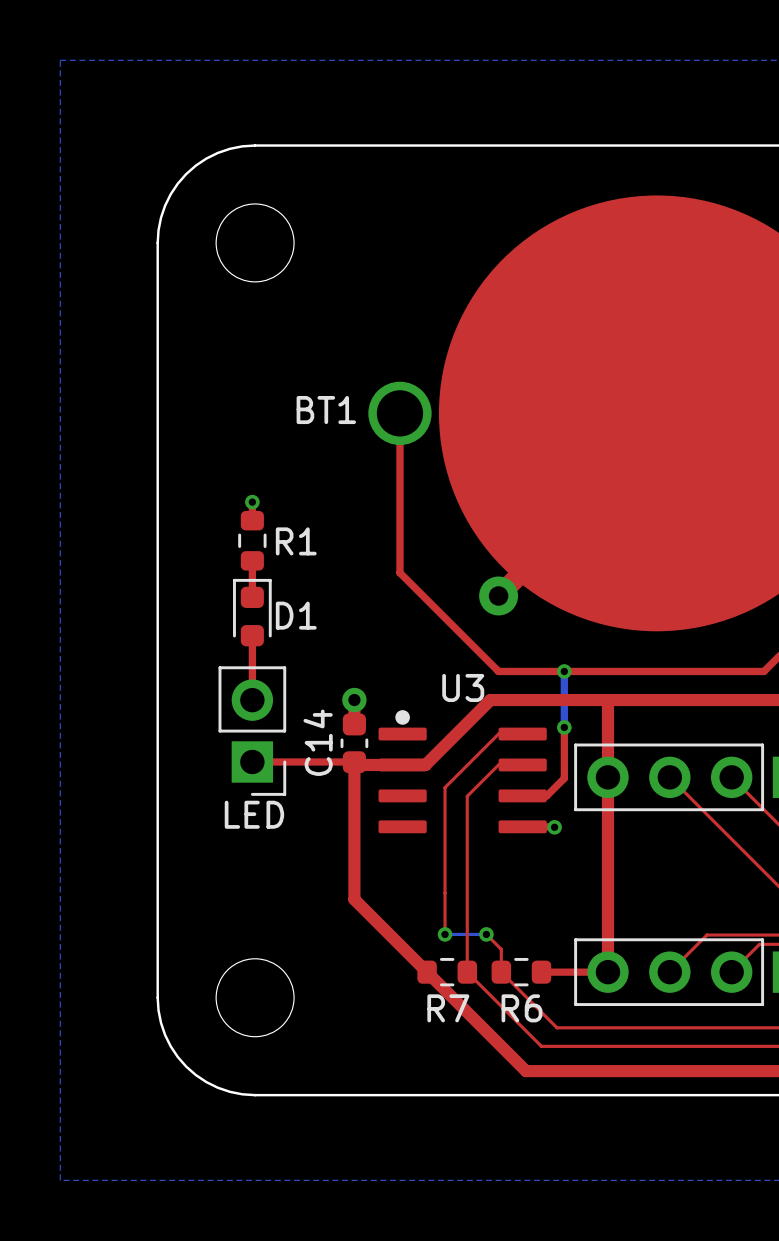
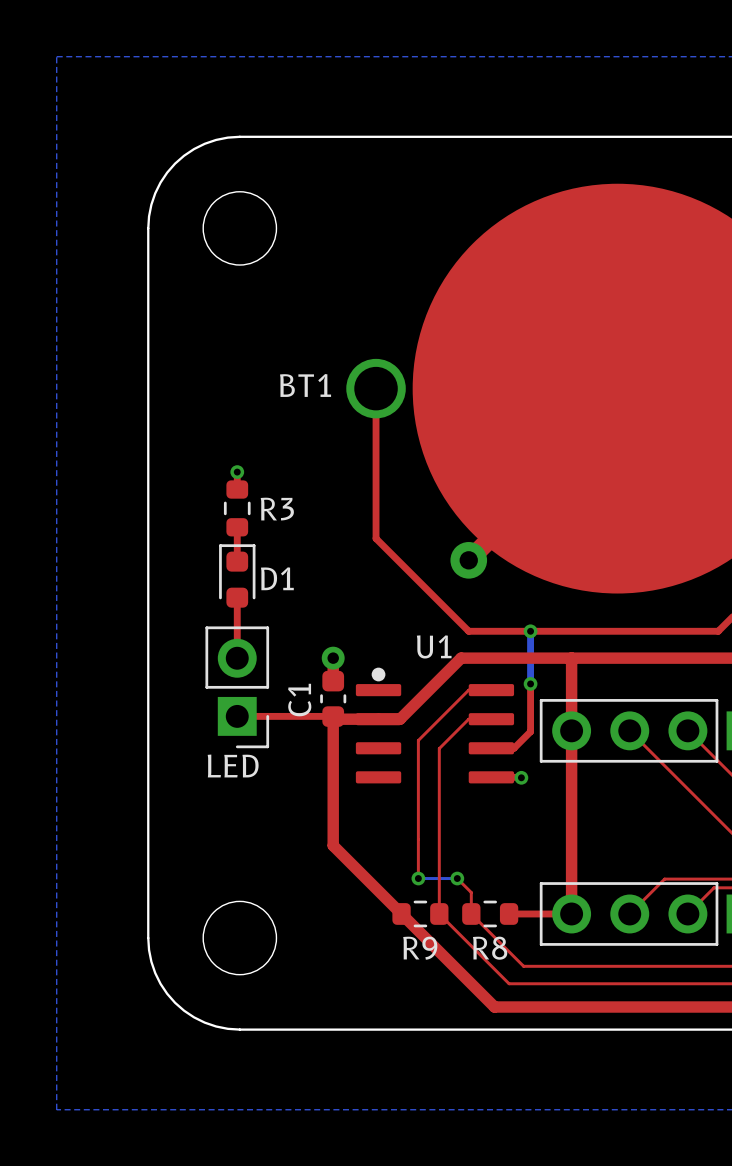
R1 name: R1 (296, 541) -> R3 (277, 509)
U3 name: U3 (463, 687) -> U1 (434, 646)
C14 name: C14 (318, 742) -> C1 (299, 700)
R7 name: R7 (448, 1008) -> R9 (420, 948)
R6 name: R6 (521, 1008) -> R8 (490, 948)

